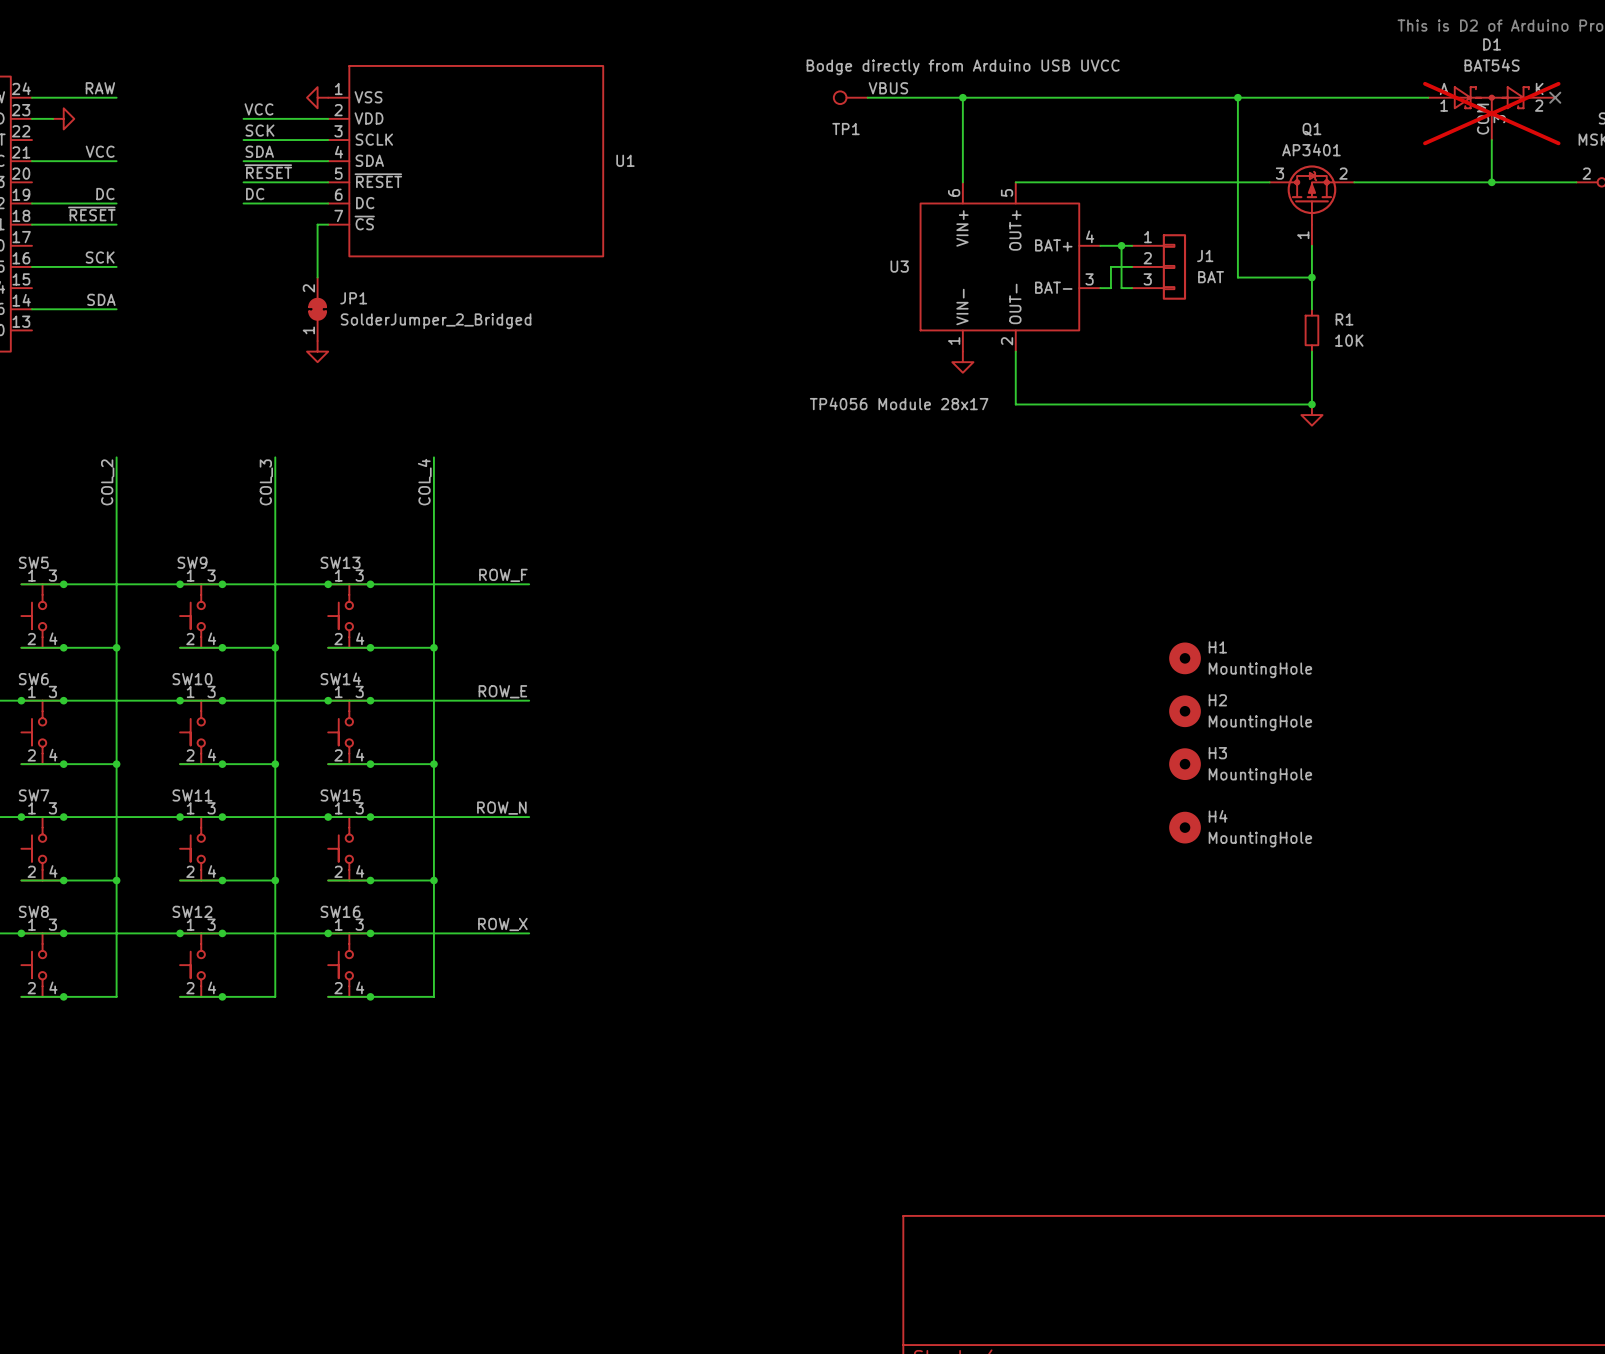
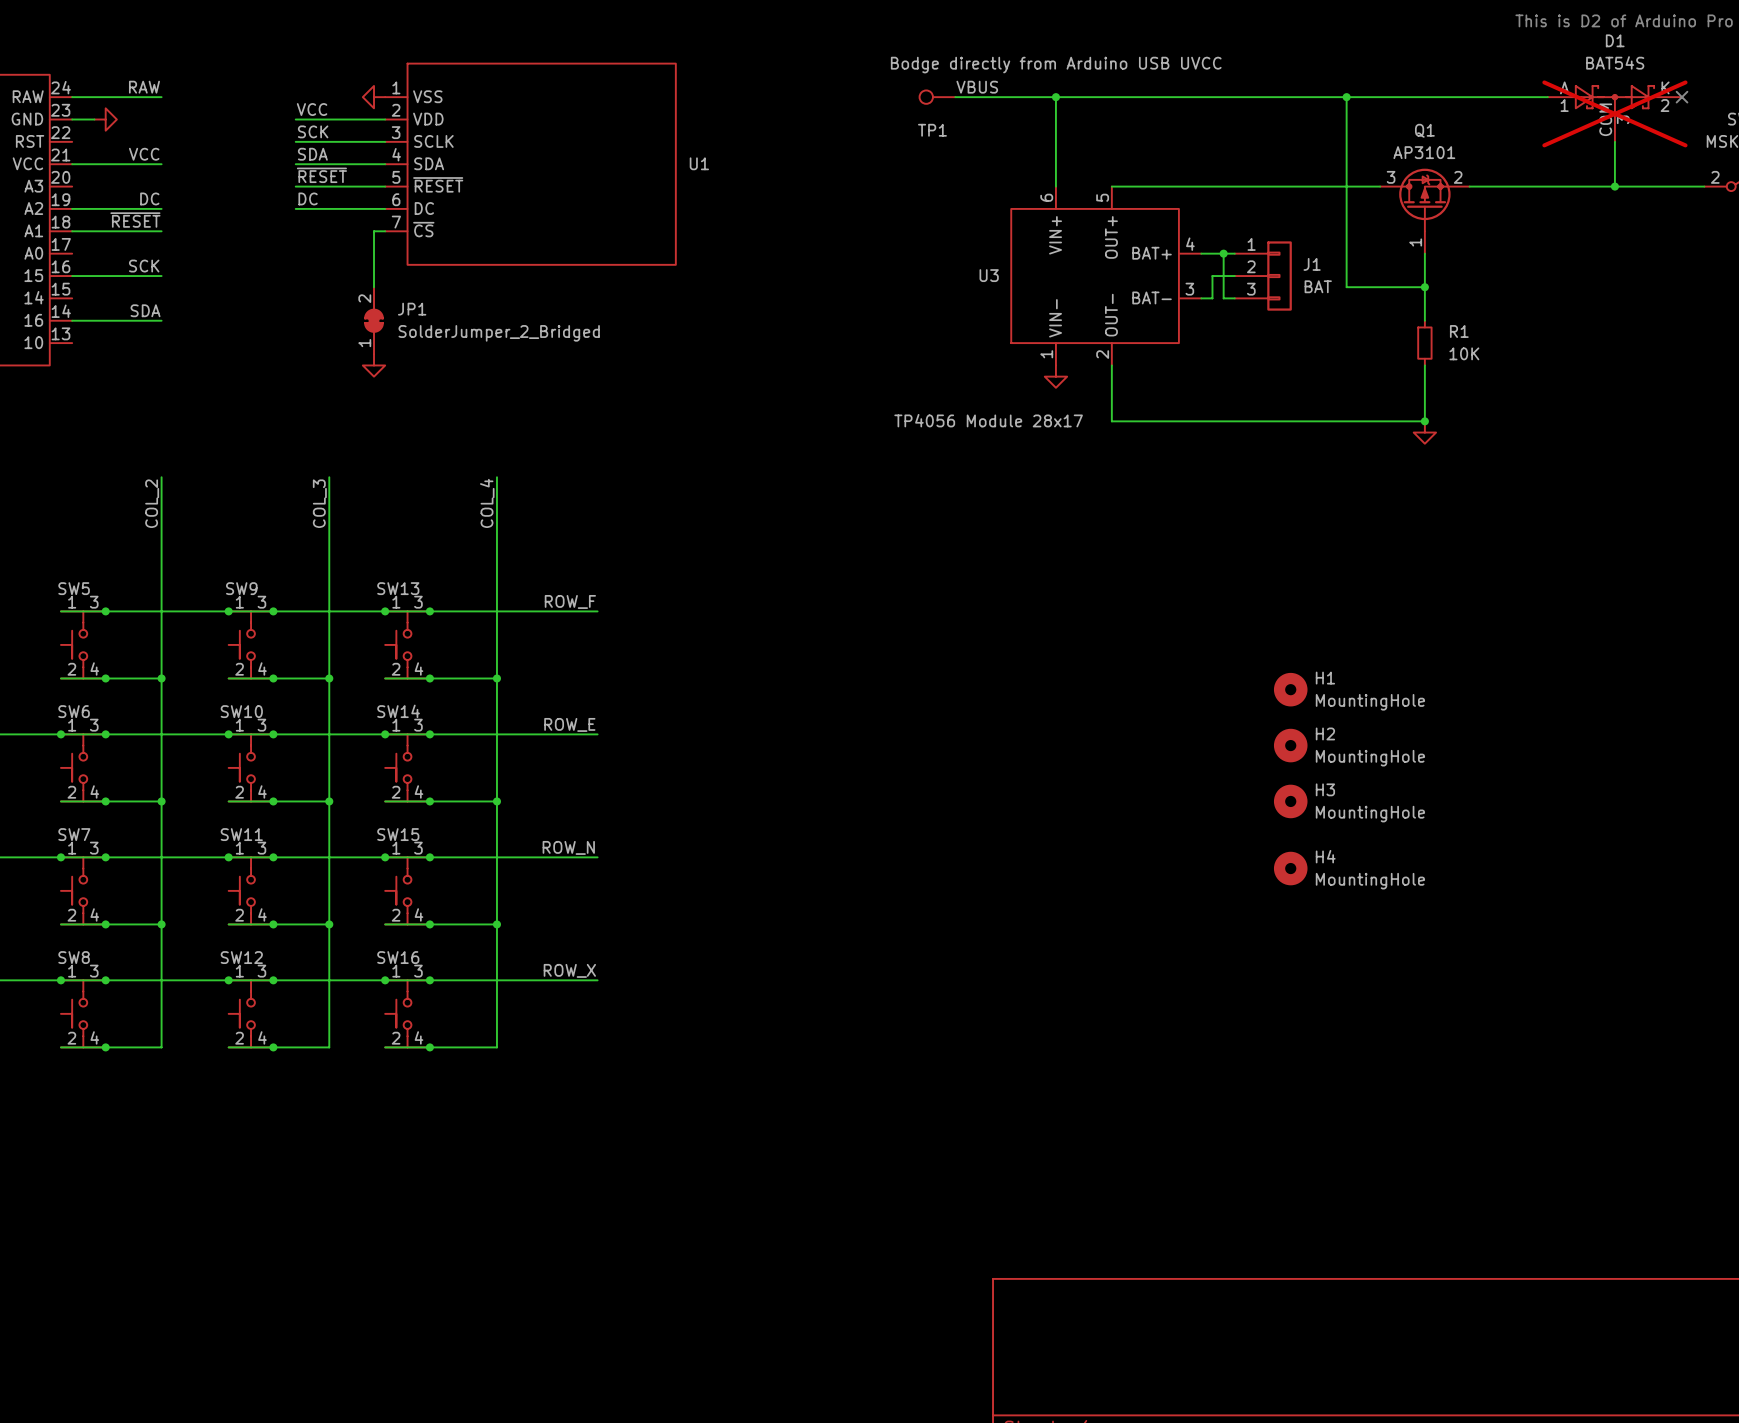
Q1 value: AP3401 (1311, 149) -> AP3101 (1424, 152)

